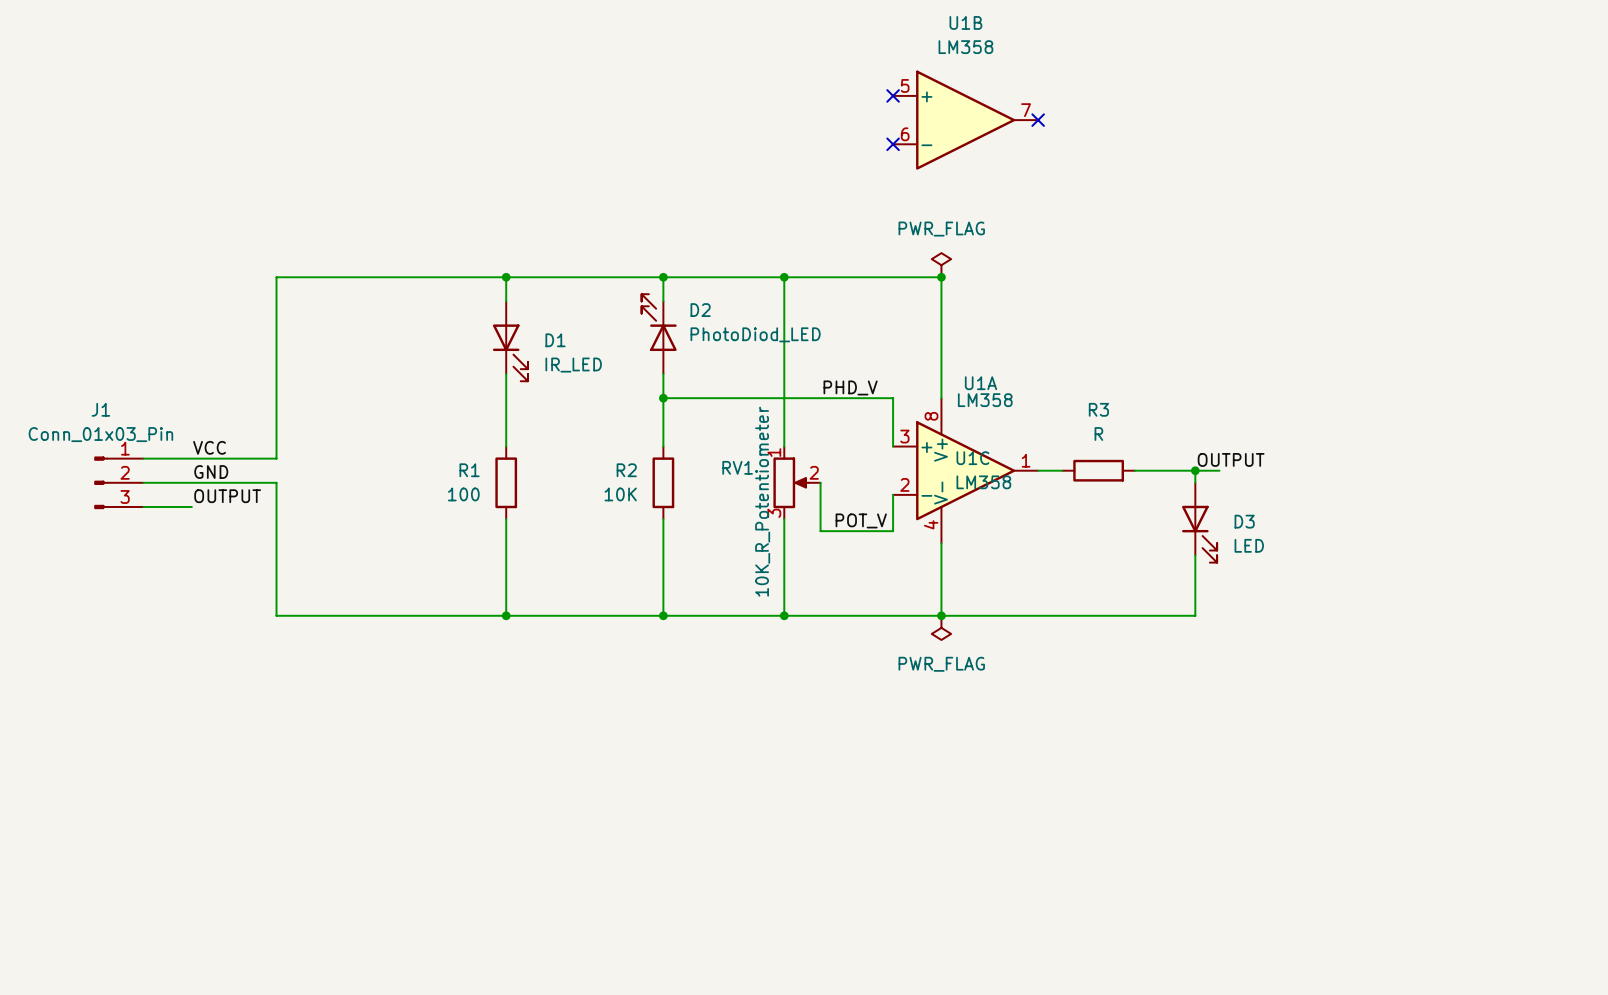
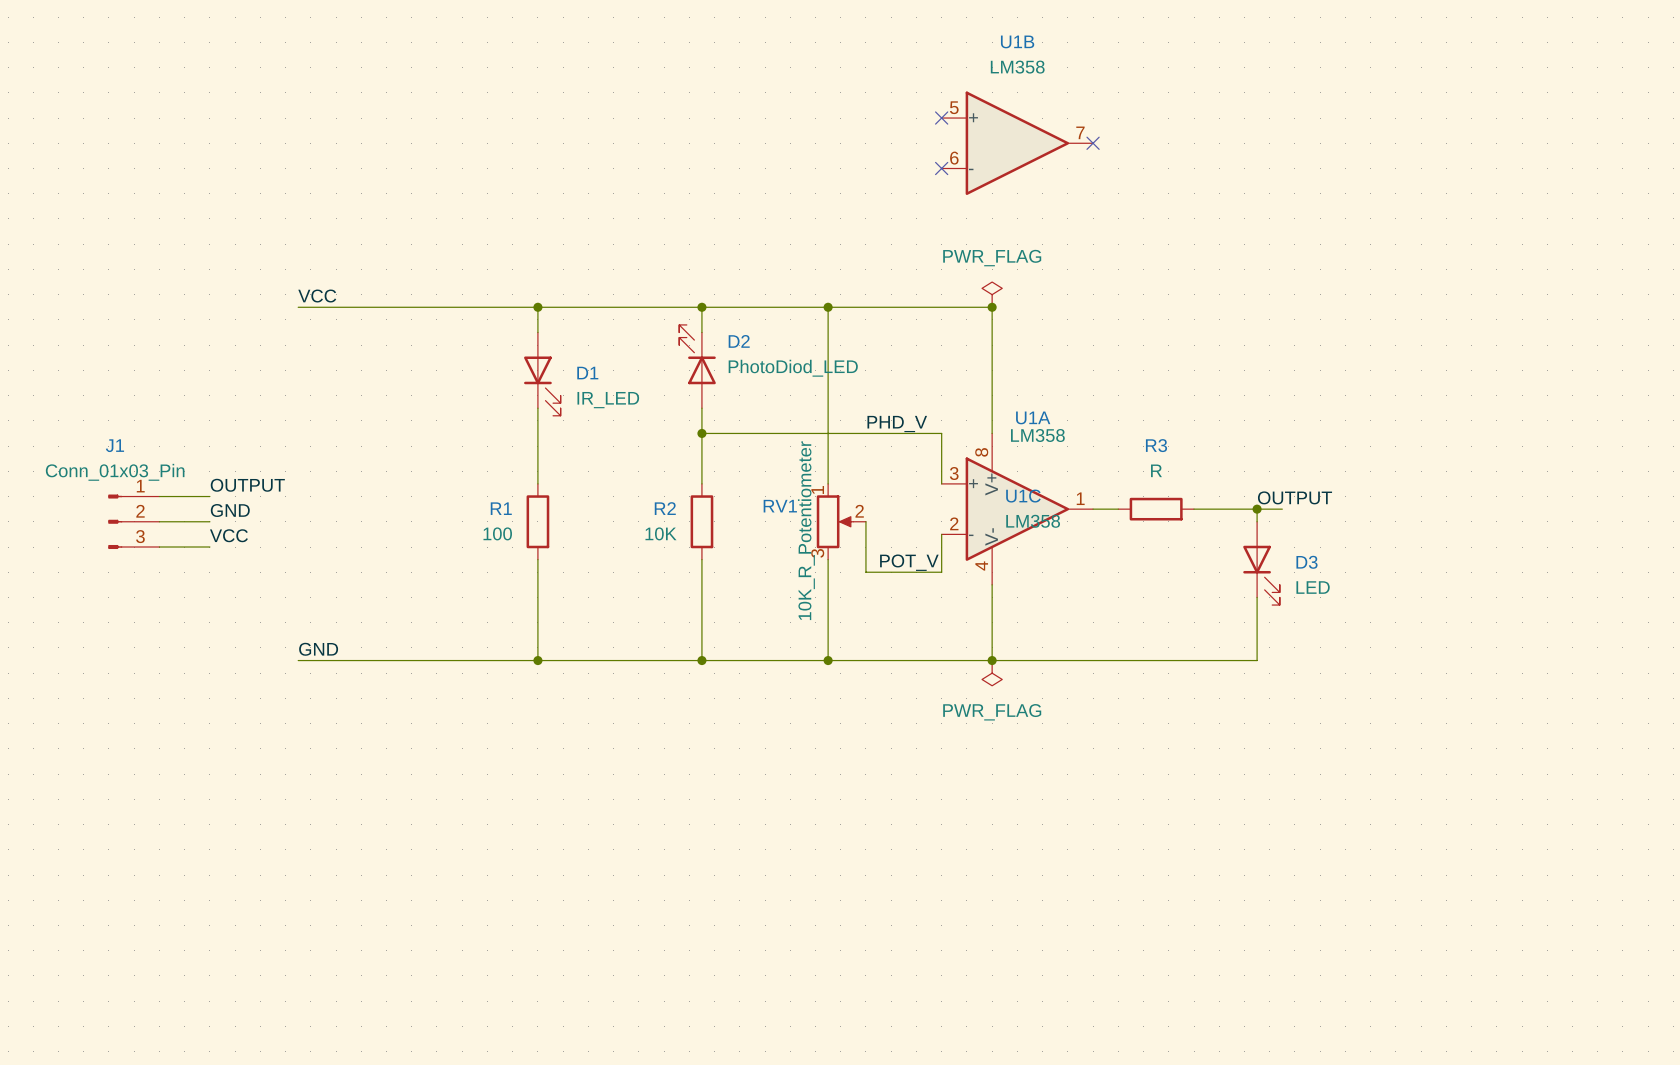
label: none -> VCC (317, 296)
wire: (276, 277) (276, 458) (191, 458) -> none
label: VCC (209, 447) -> OUTPUT (247, 485)
wire: (191, 482) (276, 482) (276, 615) -> none
label: OUTPUT (227, 496) -> VCC (228, 535)
label: none -> GND (318, 649)

